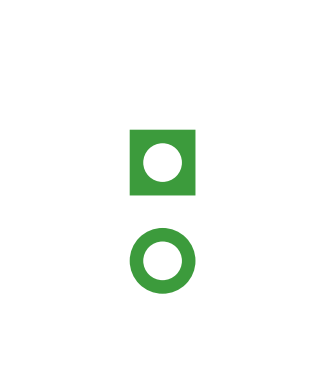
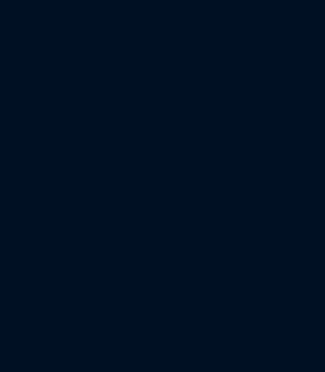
part: (162, 211) -> none

